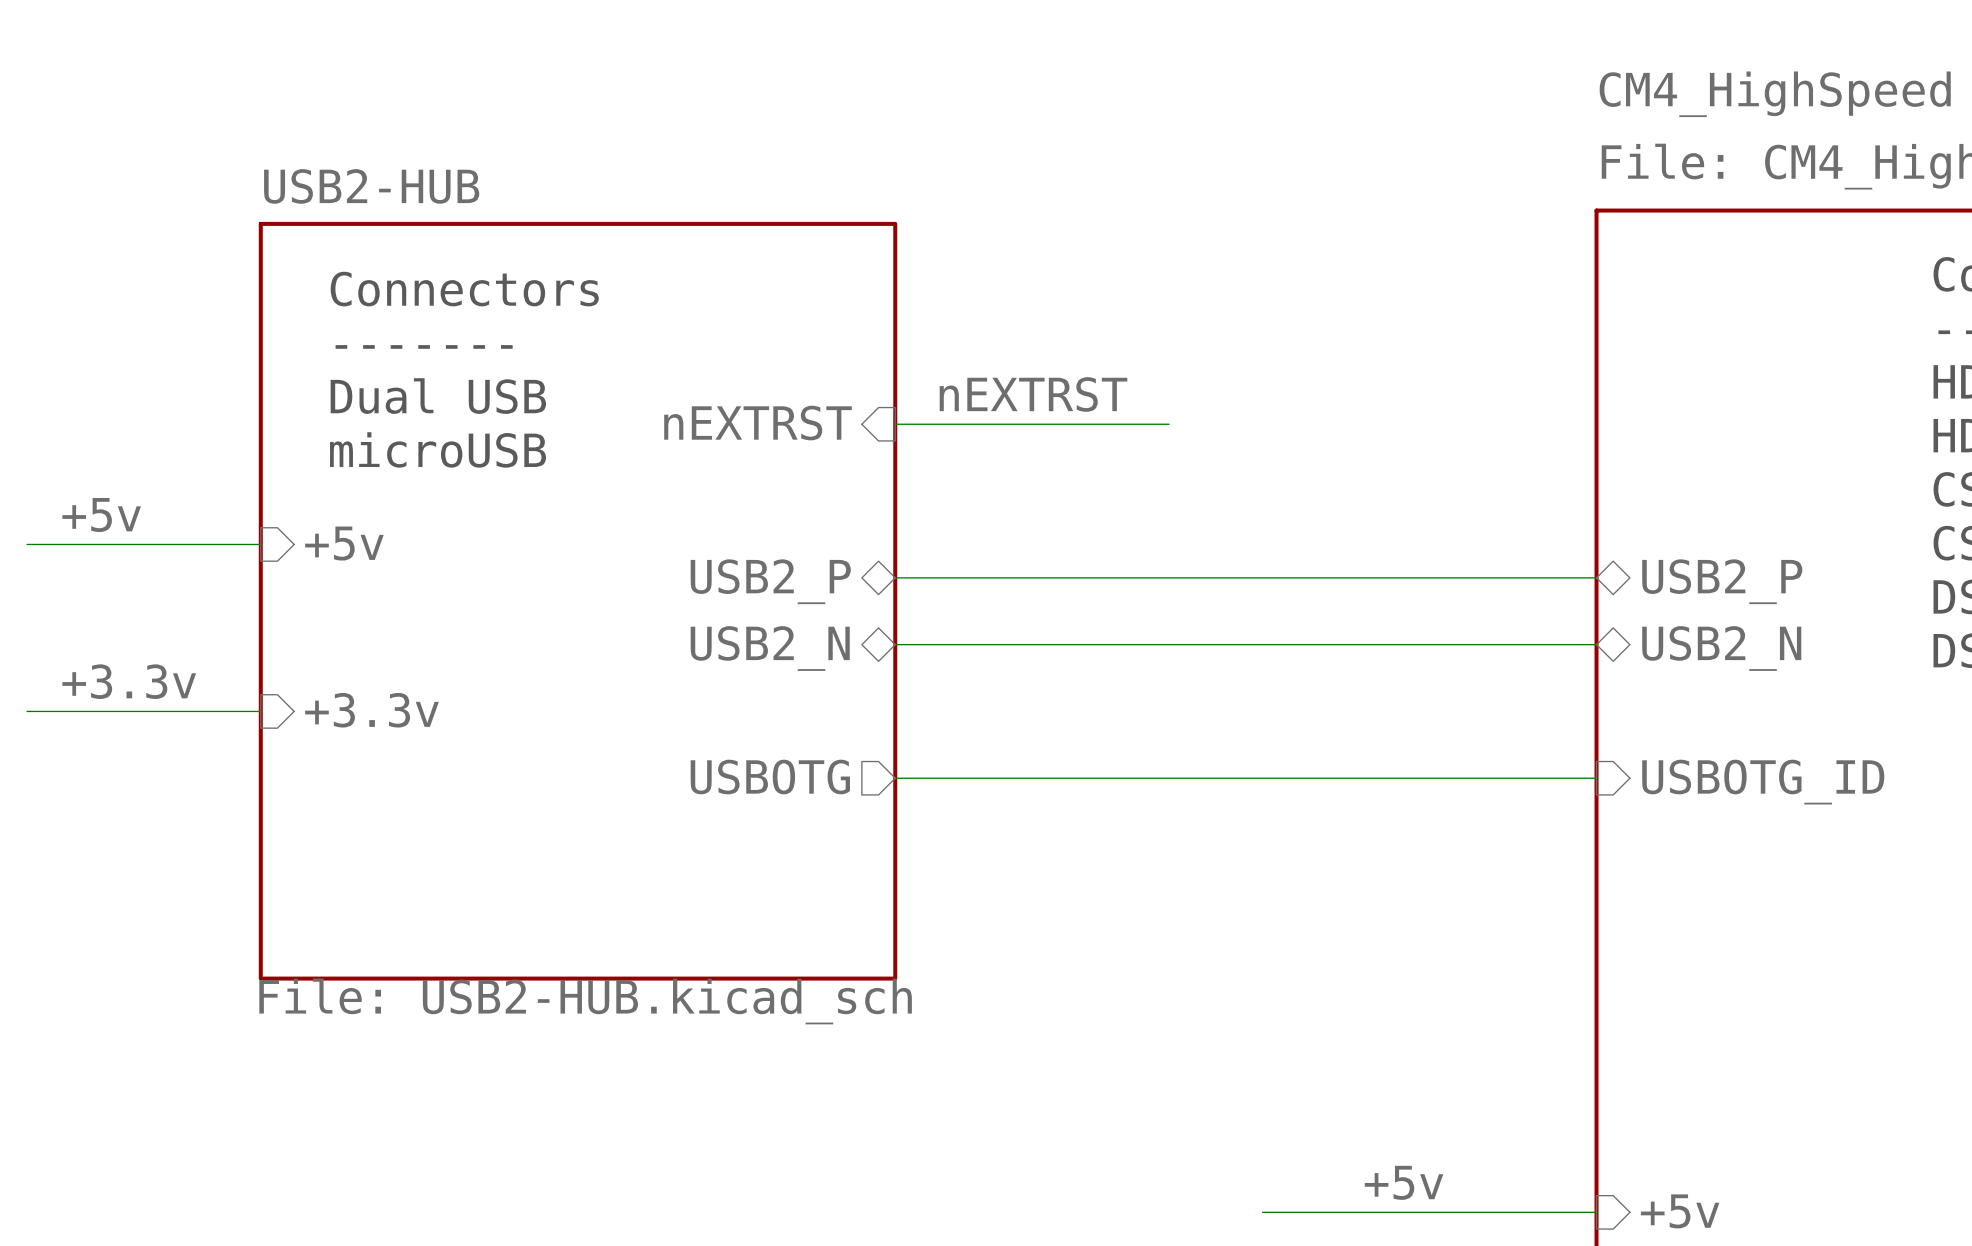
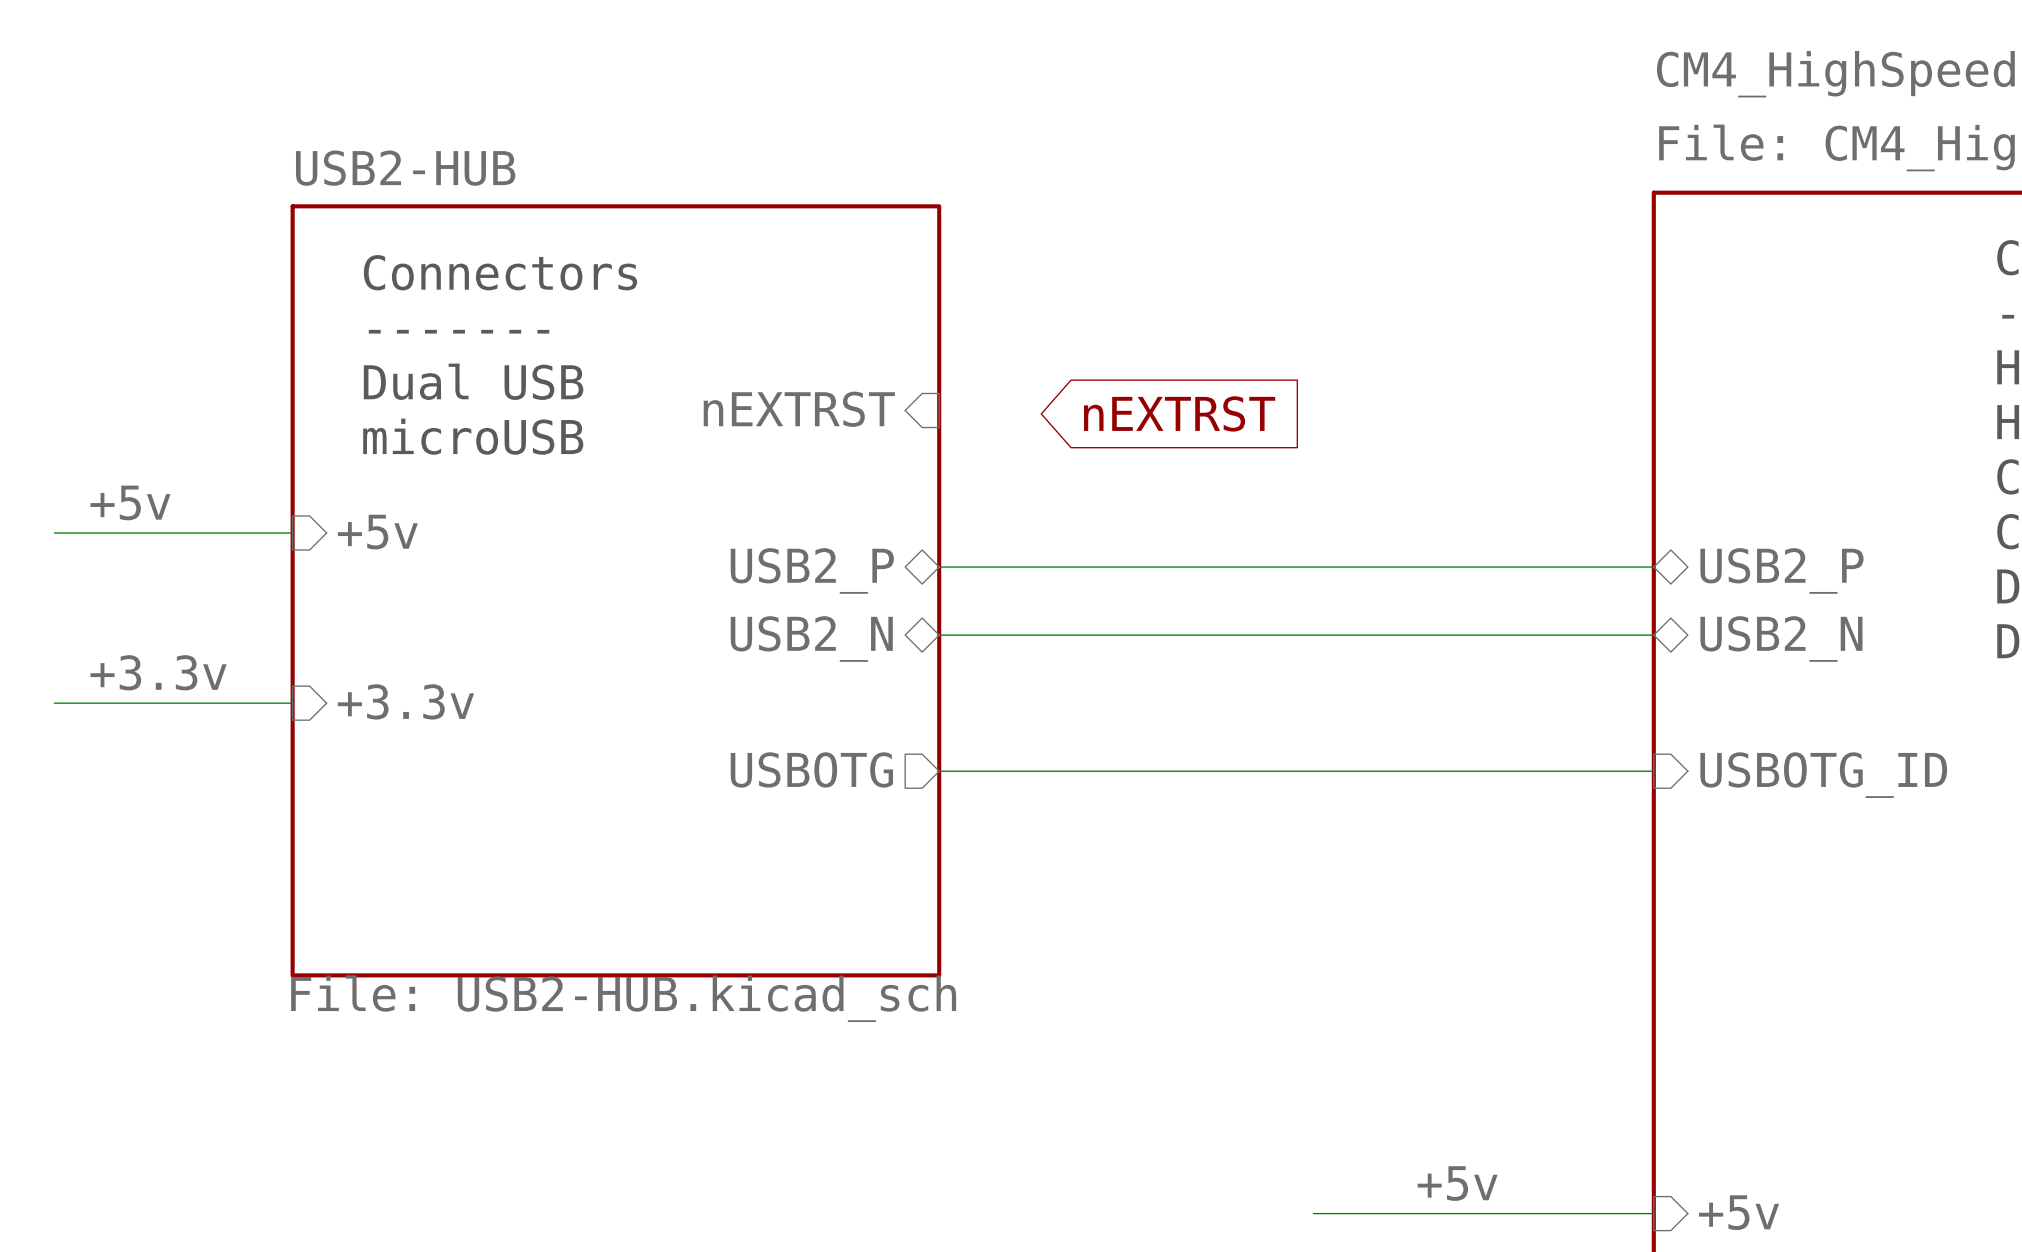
label: nEXTRST (1033, 394) -> none
wire: (895, 424) (1169, 424) -> none
global label: none -> nEXTRST (1179, 413)

